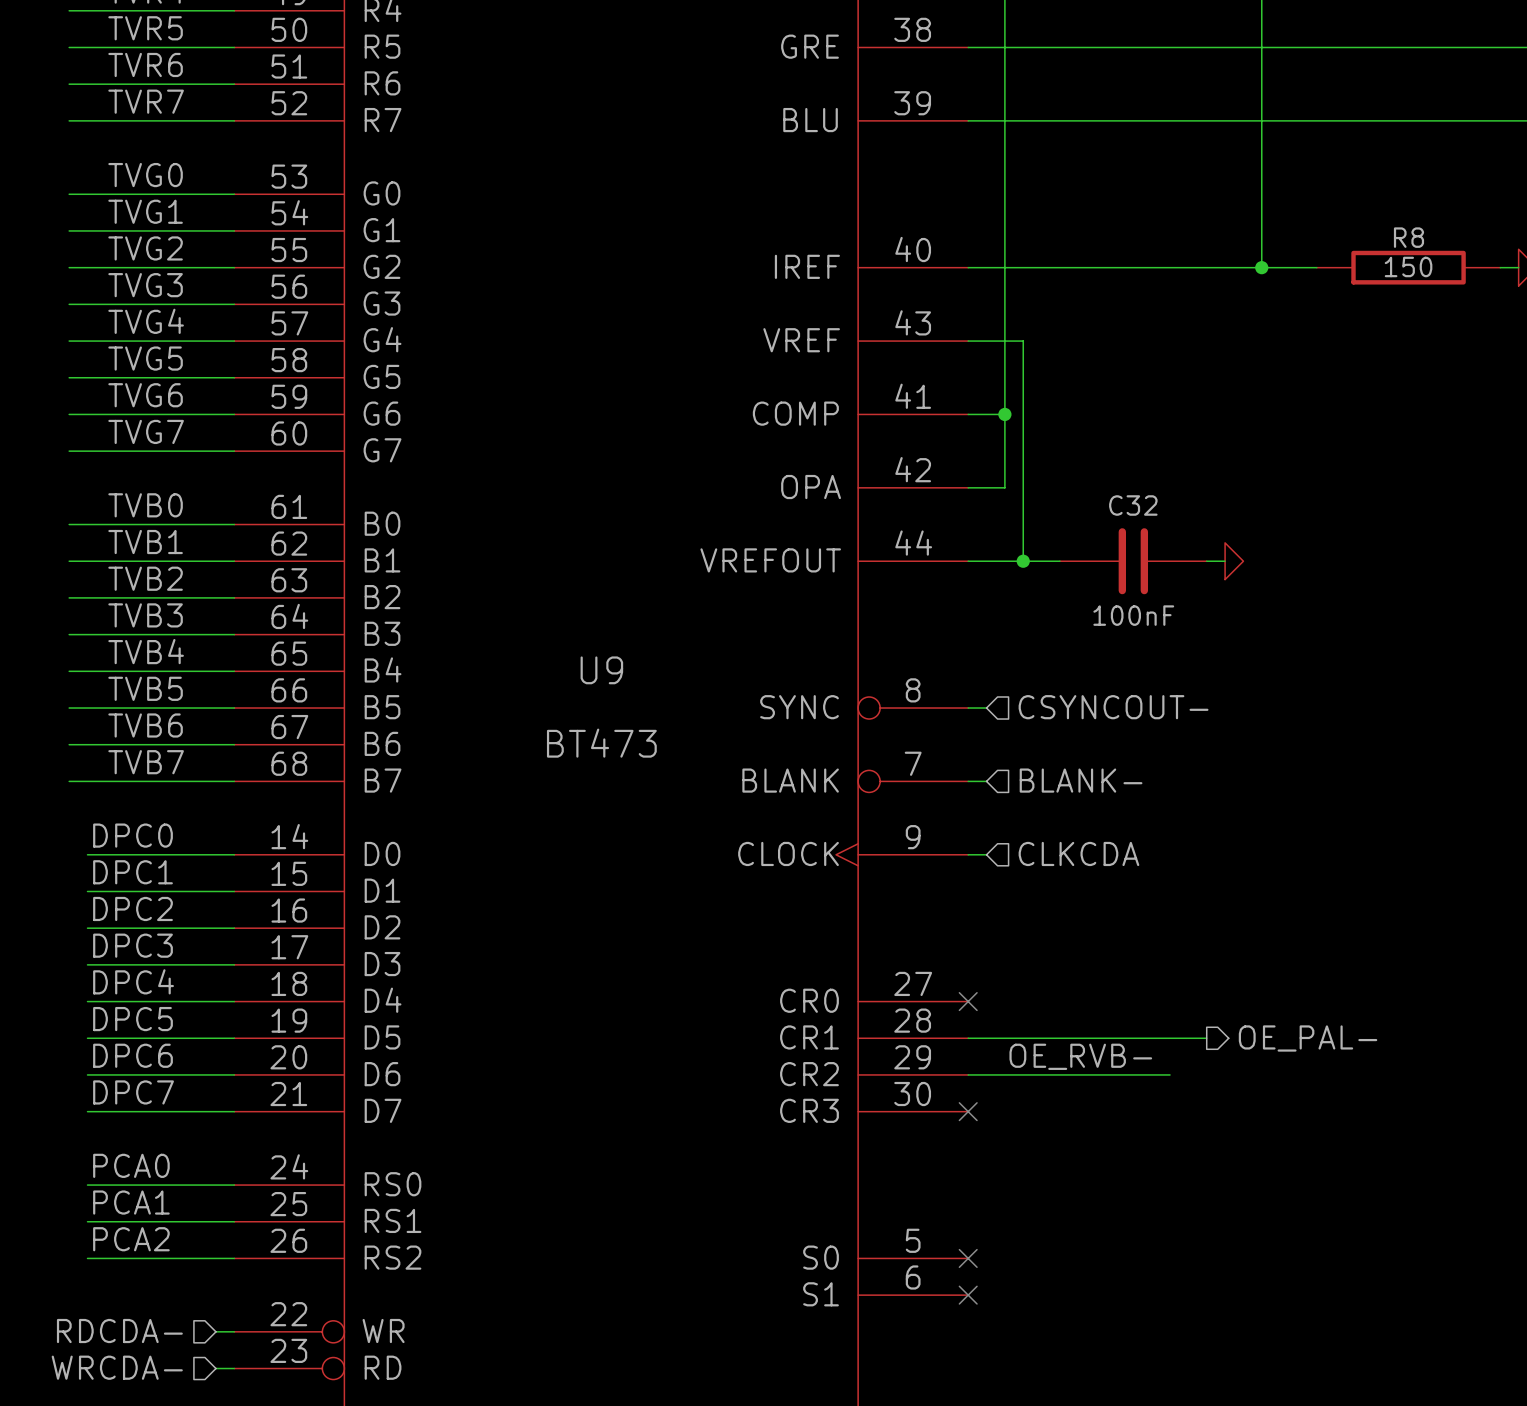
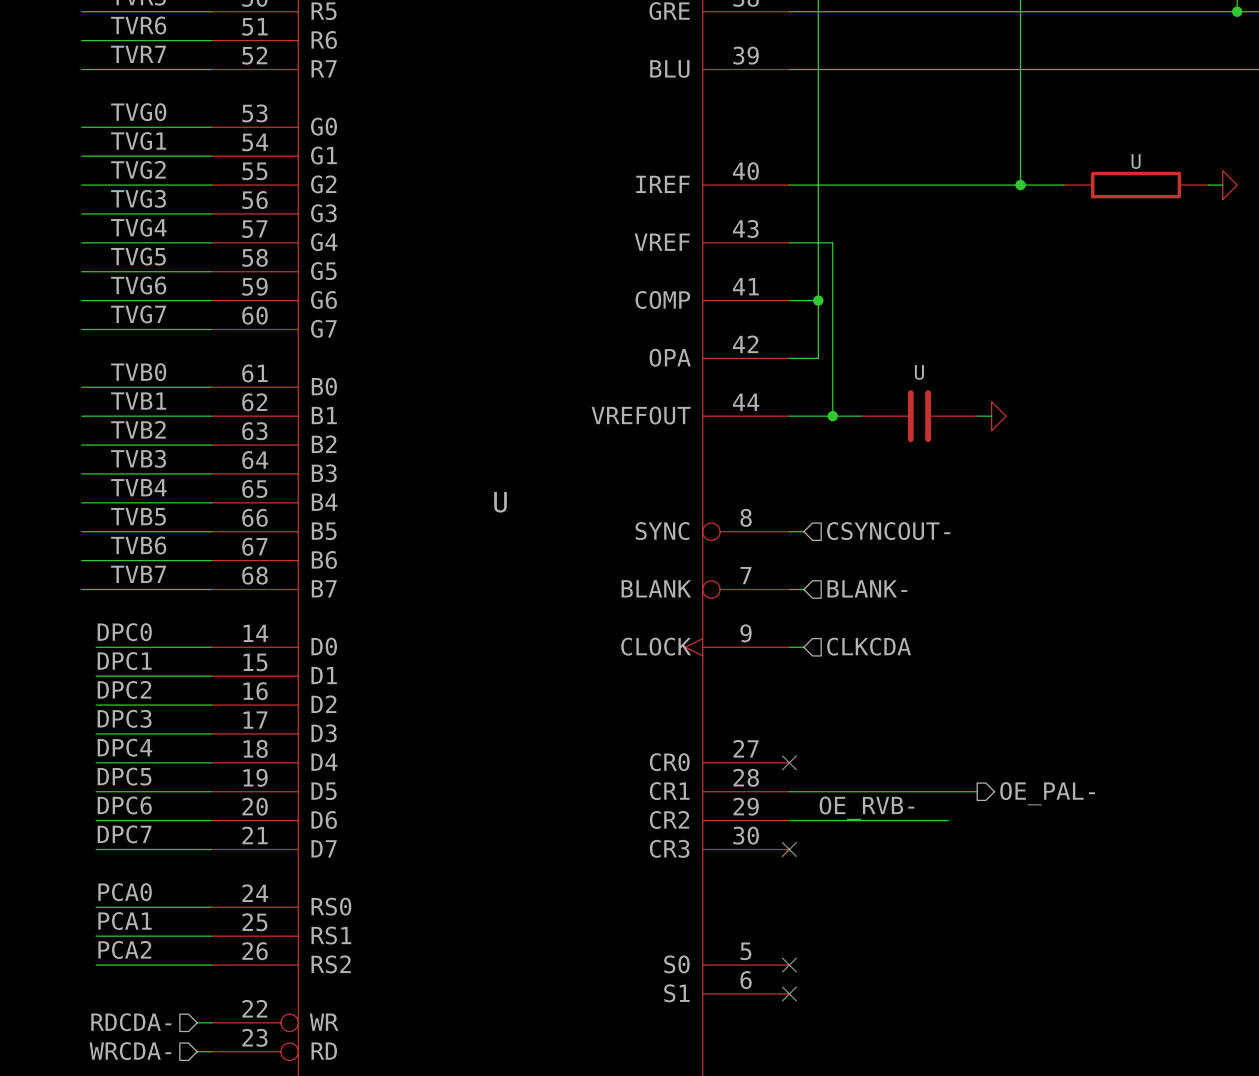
R8 name: R8 (1408, 237) -> U (1136, 161)
R8 value: 150 (1408, 266) -> none
C32 name: C32 (1133, 505) -> U (919, 372)
C32 value: 100nF (1133, 615) -> none
U9 name: U9 (601, 670) -> U (500, 502)
U9 value: BT473 (601, 743) -> none

